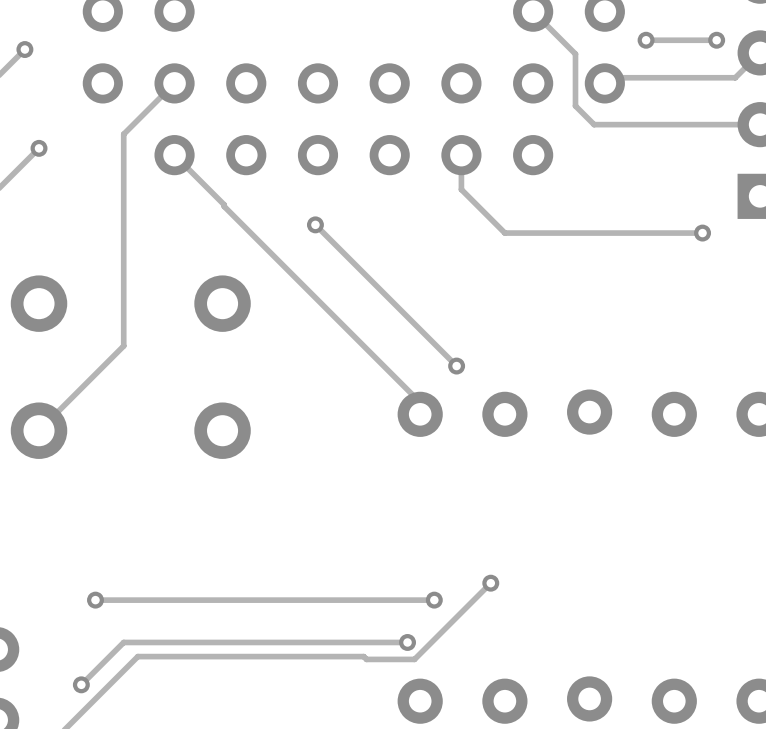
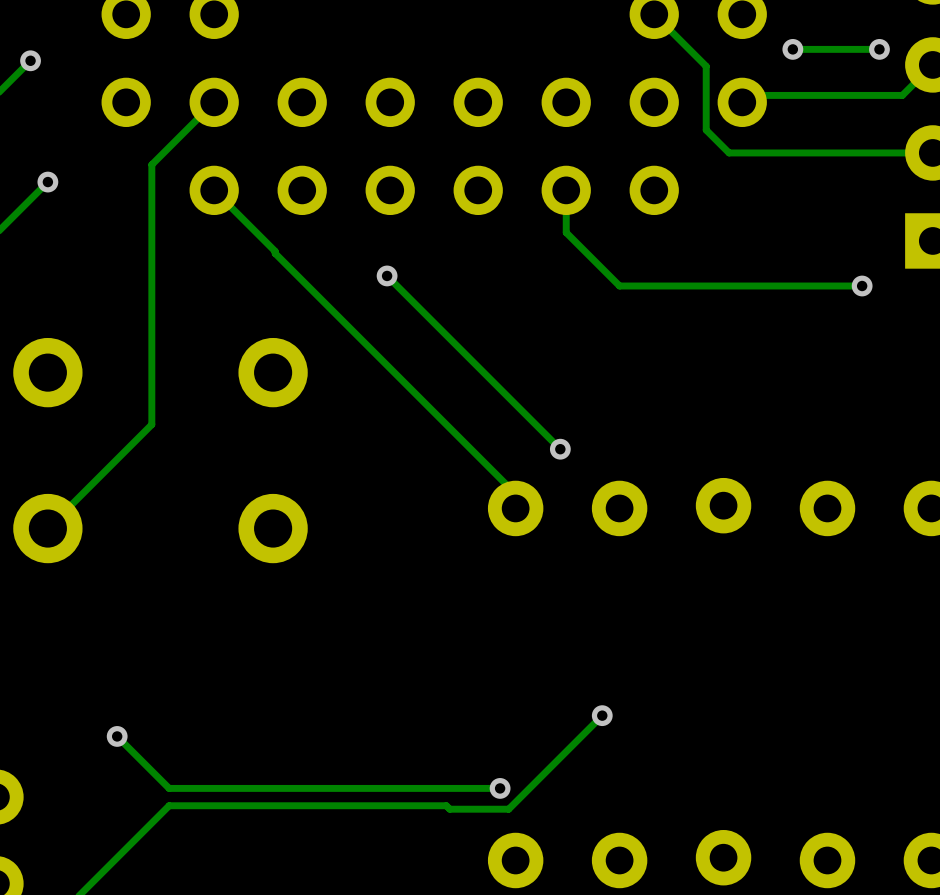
track: (434, 600) (95, 600) -> none
via: (434, 600) -> none
track: (137, 642) (123, 642) (81, 684) -> (169, 788) (117, 736)
via: (81, 684) -> none

